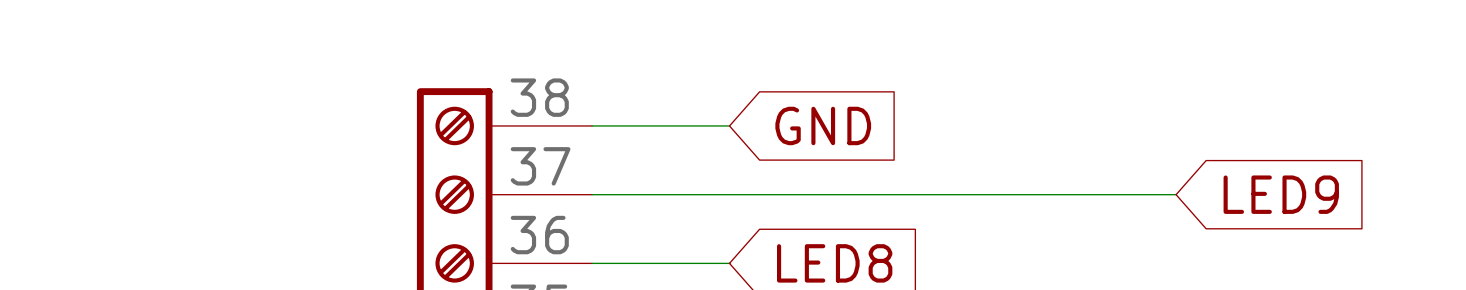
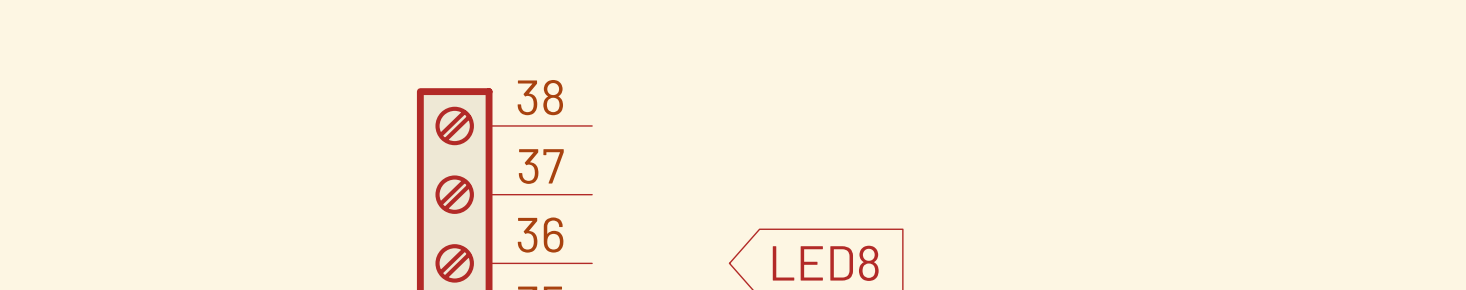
wire: (592, 125) (729, 125) -> none
global label: GND (823, 125) -> none
wire: (592, 194) (1176, 194) -> none
global label: LED9 (1281, 194) -> none
wire: (592, 263) (729, 263) -> none

